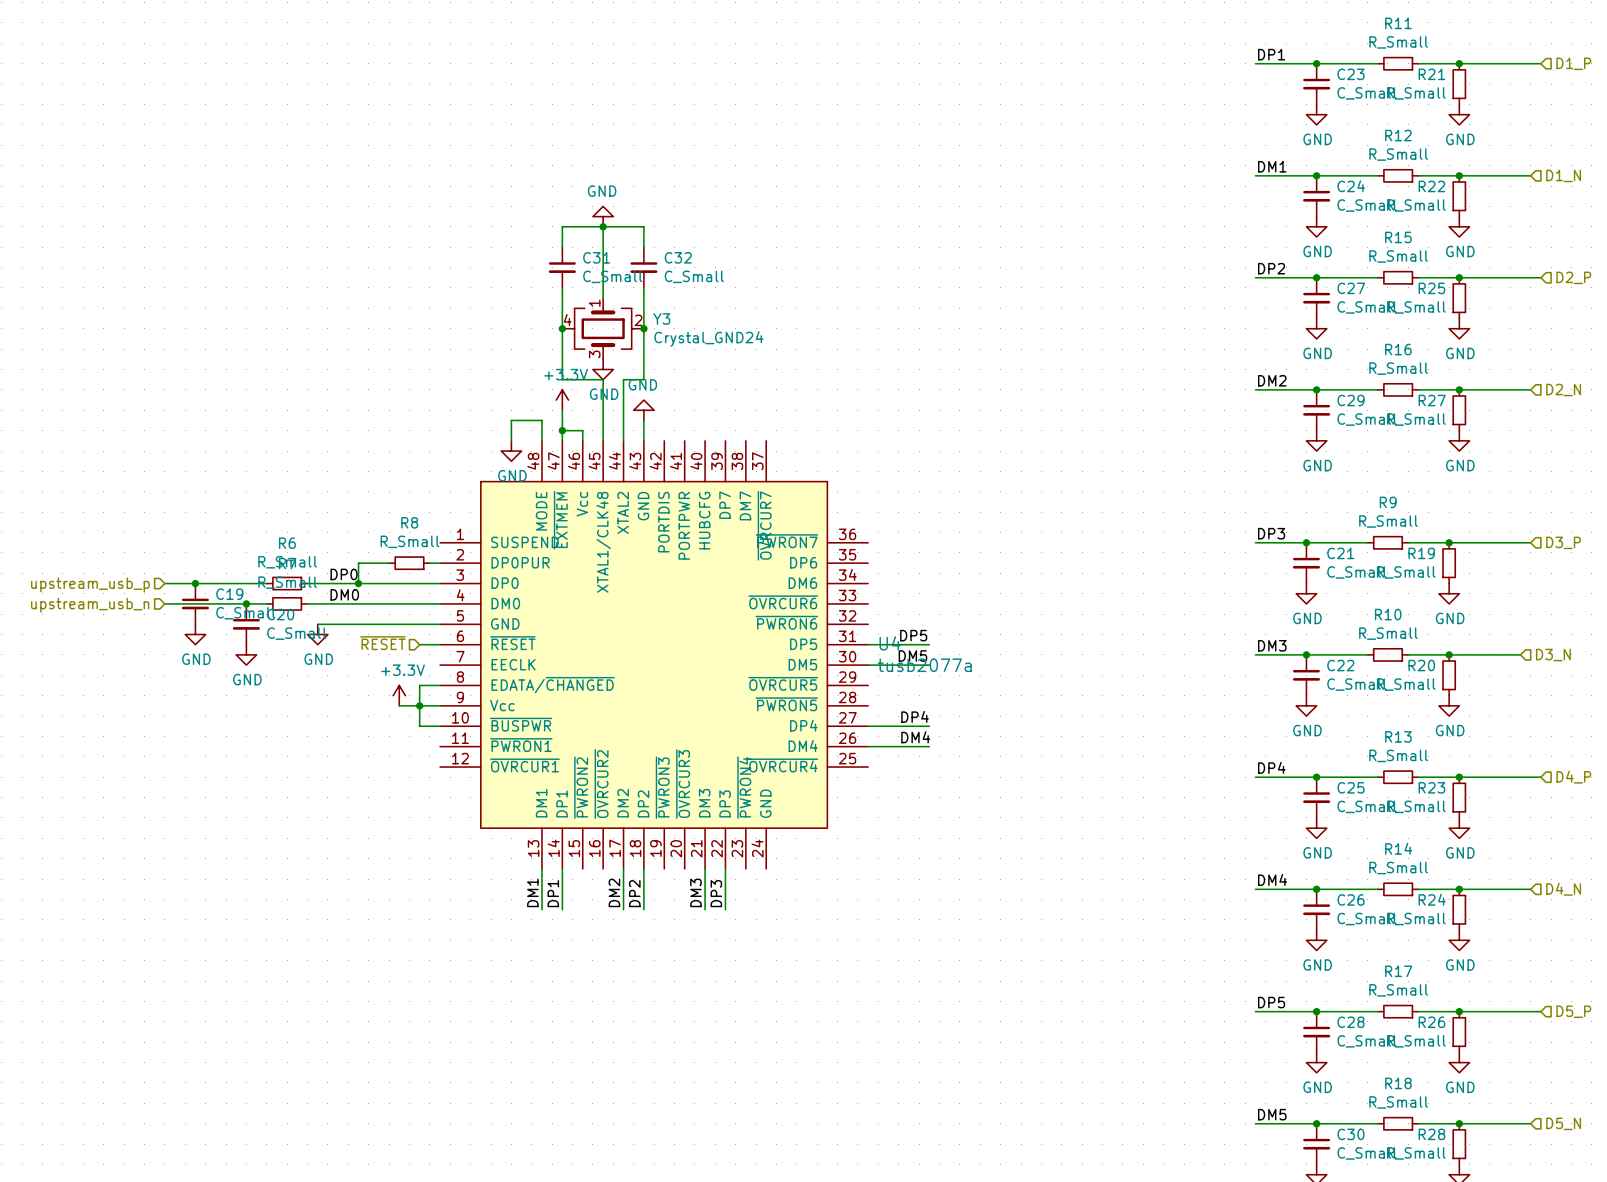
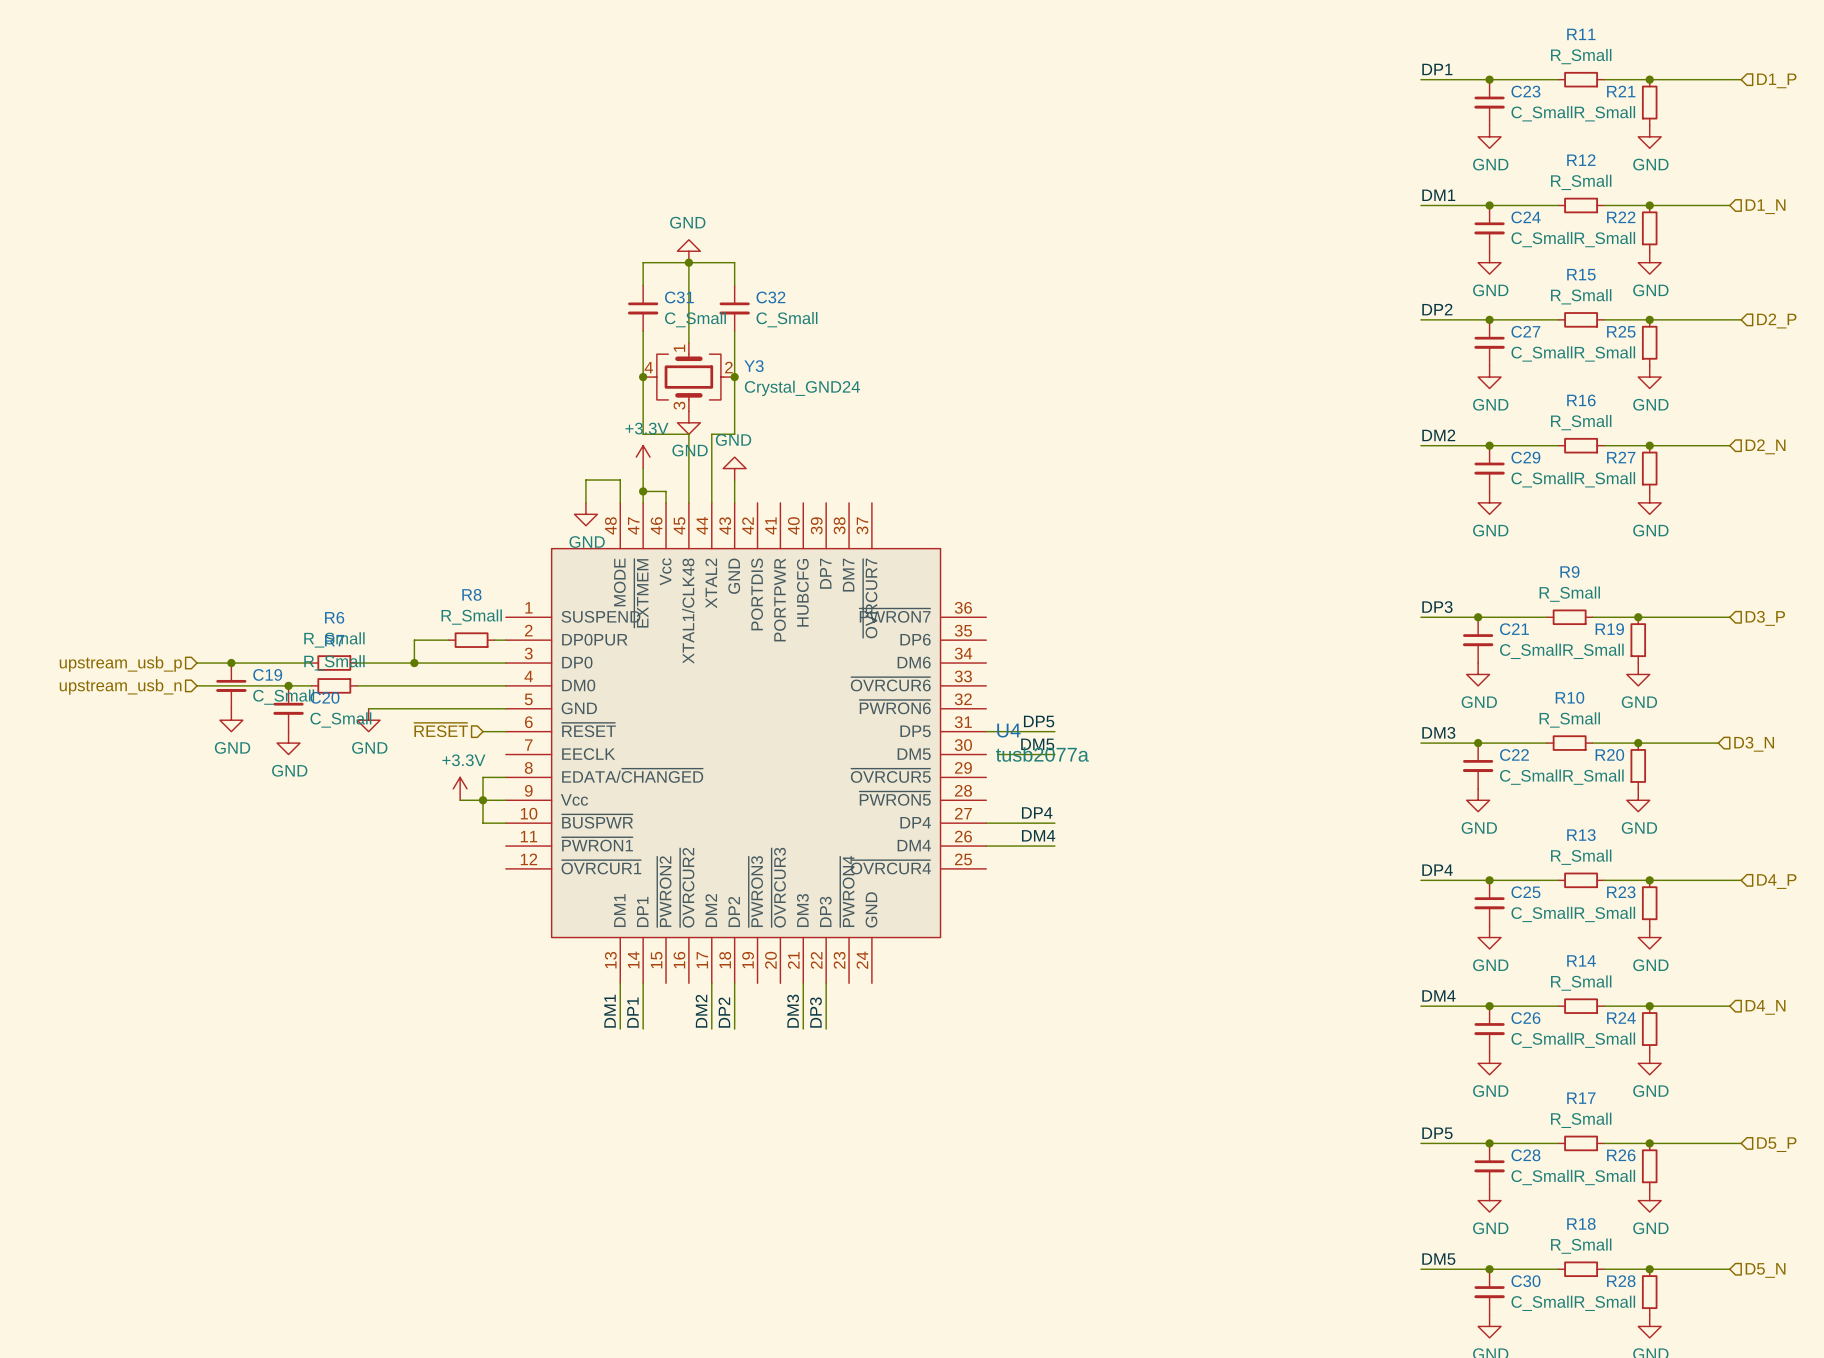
label: DP0 (344, 574) -> none
label: DM0 (344, 594) -> none
wire: (868, 665) (878, 665) -> none

